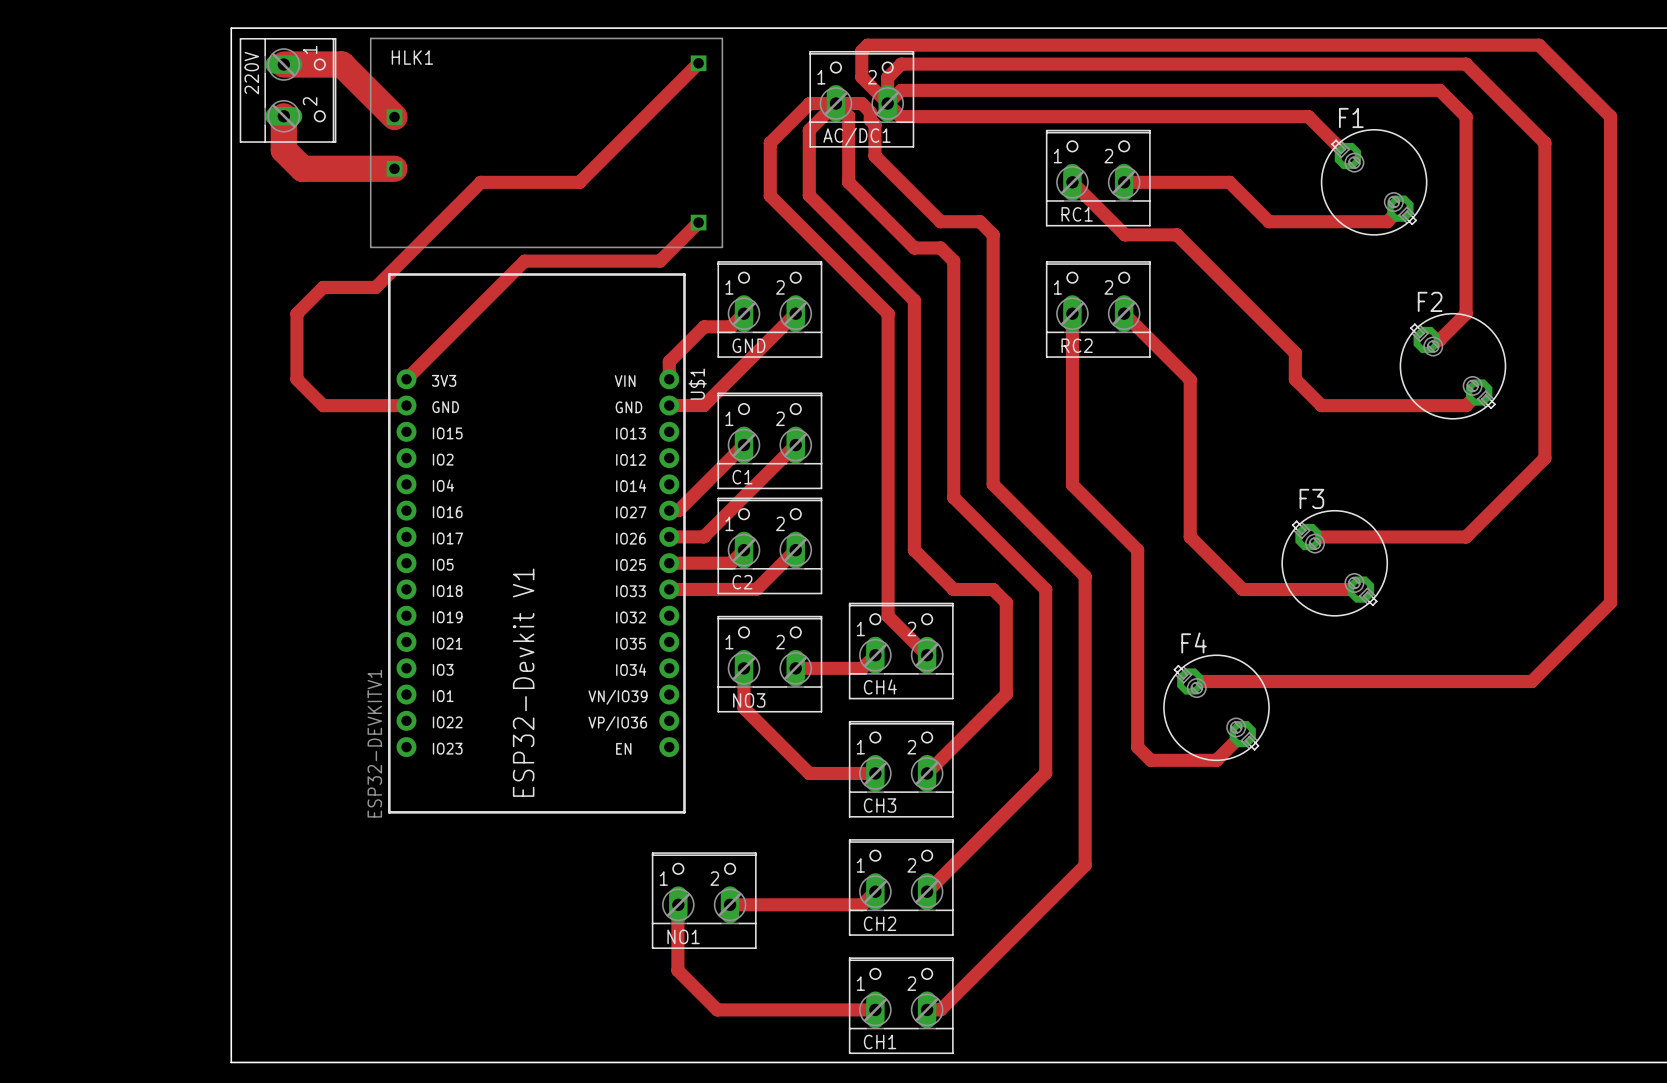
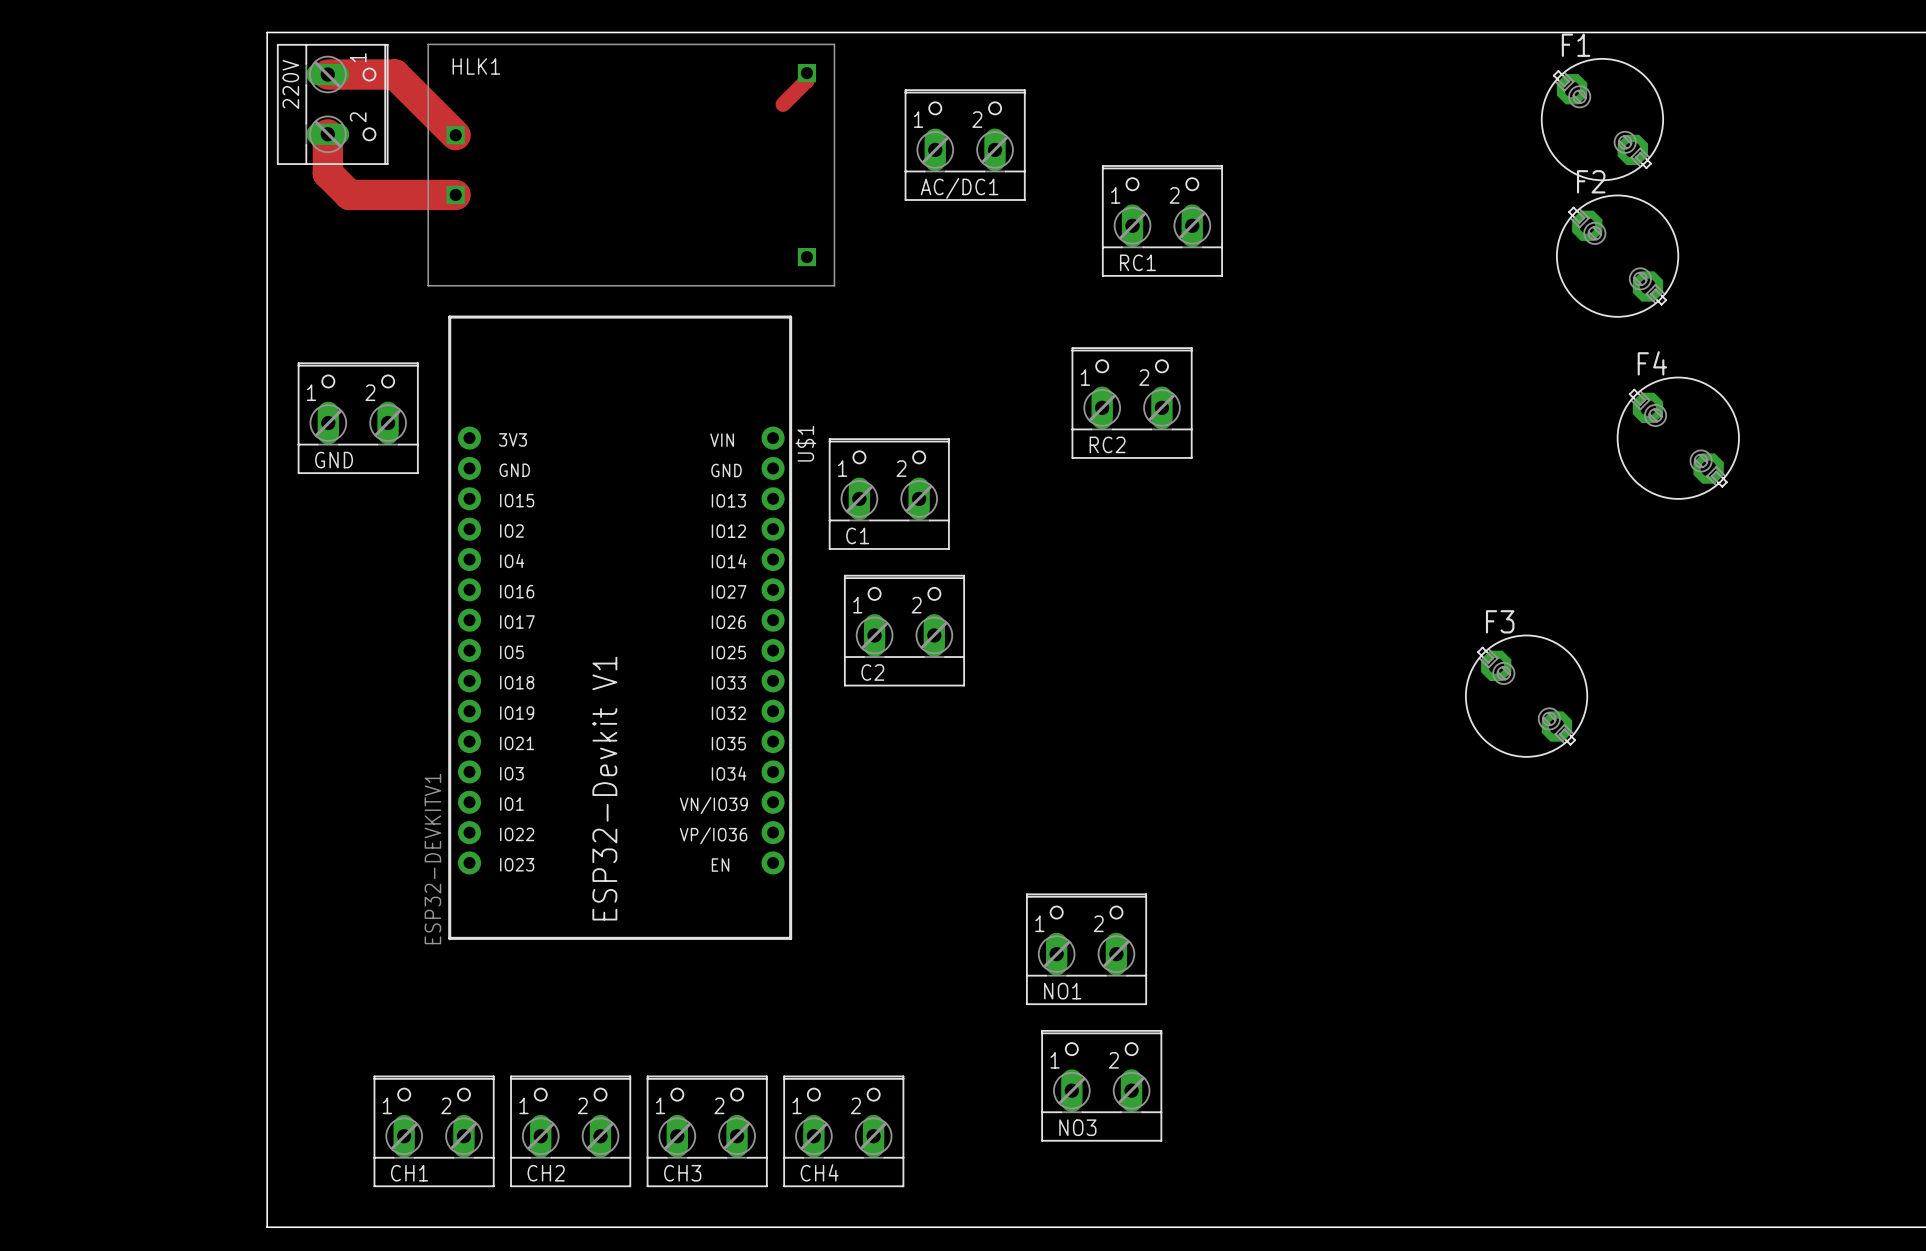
track: (698, 63) (579, 182) (480, 182) (375, 287) (323, 287) (296, 313) (296, 379) (323, 405) (406, 405) -> (806, 73) (806, 80) (783, 104)
AC/DC1 position: (861, 99) -> (965, 145)
track: (887, 103) (861, 77) (861, 50) (867, 45) (1539, 45) (1610, 116) (1610, 602) (1531, 681) (1190, 681) -> none
track: (887, 103) (901, 90) (1439, 90) (1466, 116) (1466, 313) (1439, 339) (1426, 339) -> none
track: (887, 103) (900, 116) (1308, 116) (1347, 156) -> none
track: (887, 103) (887, 77) (901, 64) (1466, 64) (1544, 142) (1544, 458) (1466, 537) (1308, 537) -> none
RC1 position: (1098, 178) -> (1162, 220)
track: (1072, 182) (1124, 234) (1177, 234) (1295, 353) (1295, 379) (1321, 405) (1466, 405) (1479, 392) -> none
track: (1124, 182) (1229, 182) (1269, 221) (1387, 221) (1400, 208) -> none
F1 position: (1374, 182) -> (1602, 119)
track: (698, 222) (660, 261) (524, 261) (406, 379) -> none
GND: (769, 309) -> none
RC2 position: (1098, 309) -> (1132, 403)
track: (744, 313) (730, 326) (704, 326) (669, 361) (669, 379) -> none
track: (795, 313) (703, 405) (669, 405) -> none
track: (1072, 313) (1072, 484) (1137, 550) (1137, 747) (1150, 760) (1216, 760) (1242, 734) -> none
track: (1124, 313) (1190, 379) (1190, 537) (1242, 589) (1360, 589) -> none
GND: none -> (358, 418)
F2 position: (1452, 366) -> (1617, 256)
C1 position: (769, 440) -> (889, 494)
track: (744, 445) (678, 510) (669, 510) -> none
track: (795, 445) (703, 536) (669, 536) -> none
C2 position: (769, 545) -> (904, 630)
track: (744, 550) (730, 563) (669, 563) -> none
track: (795, 550) (756, 589) (669, 589) -> none
F3 position: (1334, 563) -> (1526, 696)
CH4 position: (901, 651) -> (843, 1131)
track: (875, 655) (862, 668) (795, 668) -> none
track: (927, 655) (888, 616) (888, 313) (770, 195) (770, 142) (809, 103) (861, 103) (870, 111) (870, 119) (874, 124) (874, 156) (940, 221) (980, 221) (993, 234) (993, 484) (1085, 576) (1085, 865) (940, 1009) (927, 1009) -> none
NO3 position: (769, 664) -> (1101, 1085)
track: (744, 668) (744, 708) (809, 773) (875, 773) -> none
F4 position: (1216, 707) -> (1678, 438)
CH3 position: (901, 769) -> (707, 1131)
track: (927, 773) (1006, 694) (1006, 602) (993, 589) (953, 589) (914, 550) (914, 300) (809, 195) (809, 130) (835, 103) (848, 116) (848, 182) (914, 248) (940, 248) (953, 261) (953, 497) (1045, 589) (1045, 773) (927, 891) -> none
CH2 position: (901, 887) -> (570, 1131)
track: (875, 891) (862, 904) (730, 904) -> none
NO1 position: (704, 900) -> (1086, 949)
track: (678, 904) (677, 970) (717, 1009) (875, 1009) -> none
CH1 position: (901, 1005) -> (434, 1131)

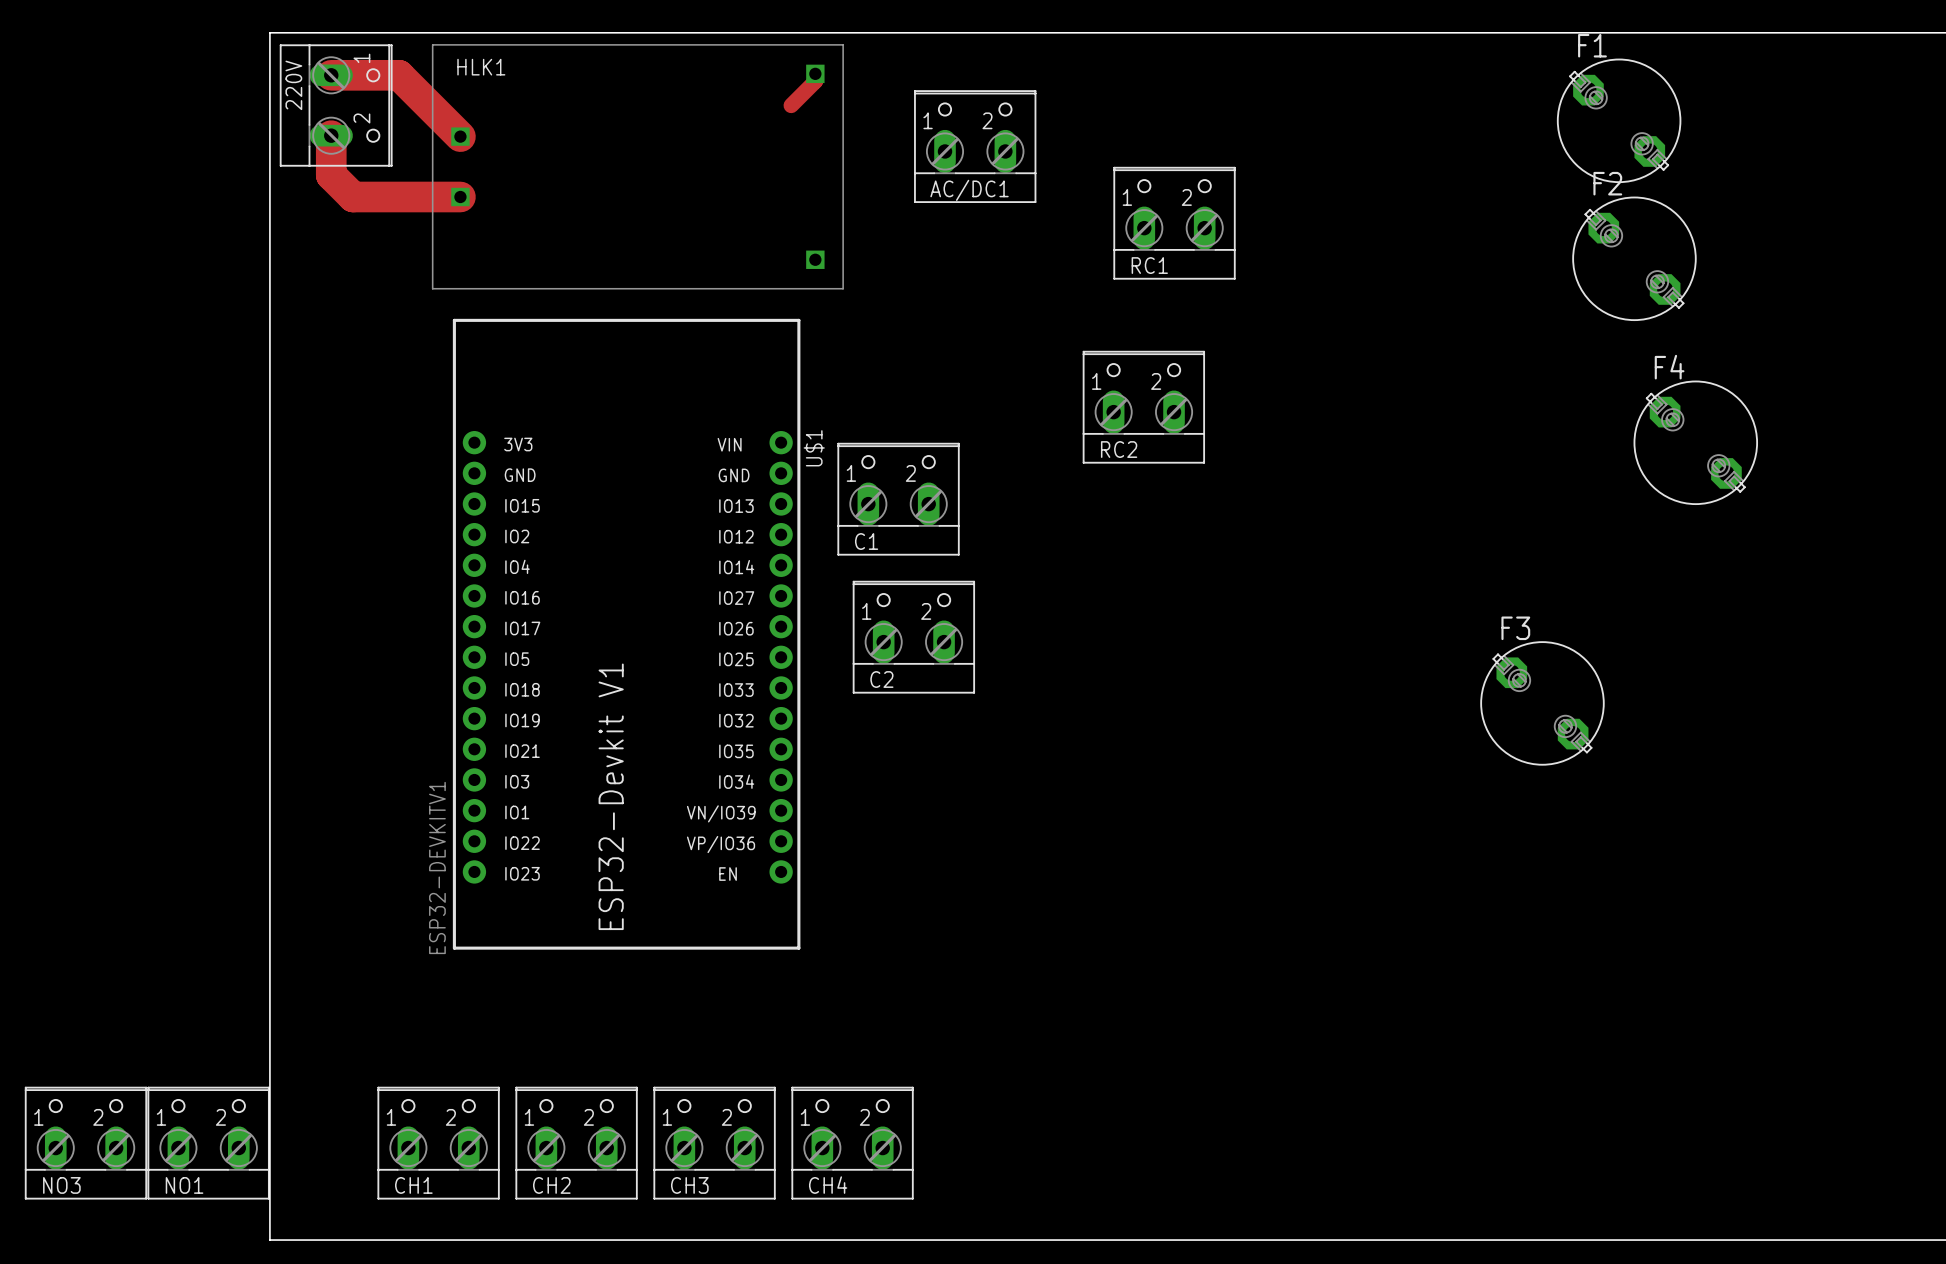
GND: (358, 418) -> none
NO1 position: (1086, 949) -> (208, 1143)
NO3 position: (1101, 1085) -> (85, 1143)

